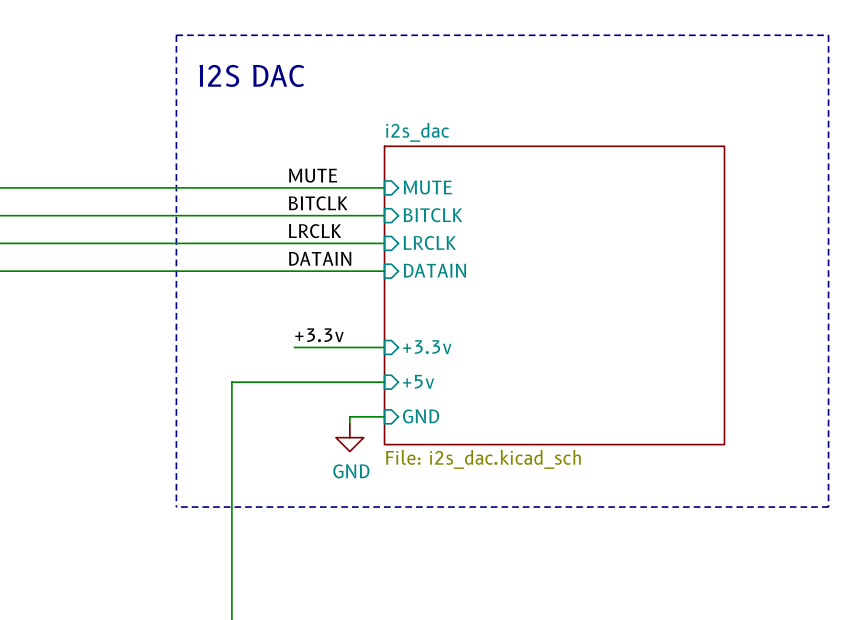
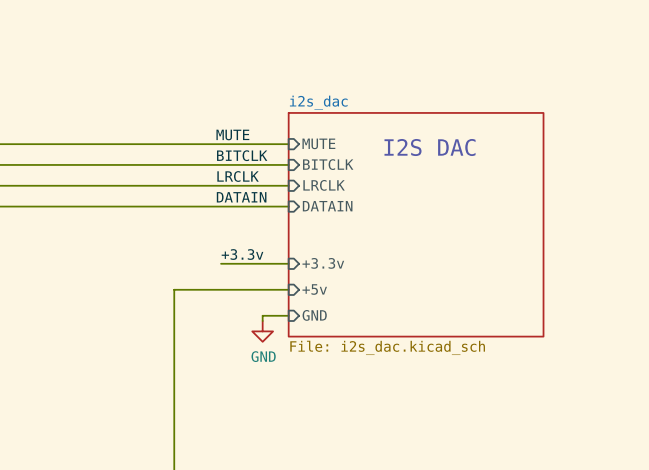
line: (176, 35) (176, 507) (828, 507) (828, 35) (176, 35) -> none
text: I2S DAC (251, 75) -> none
text: none -> I2S DAC (430, 147)

